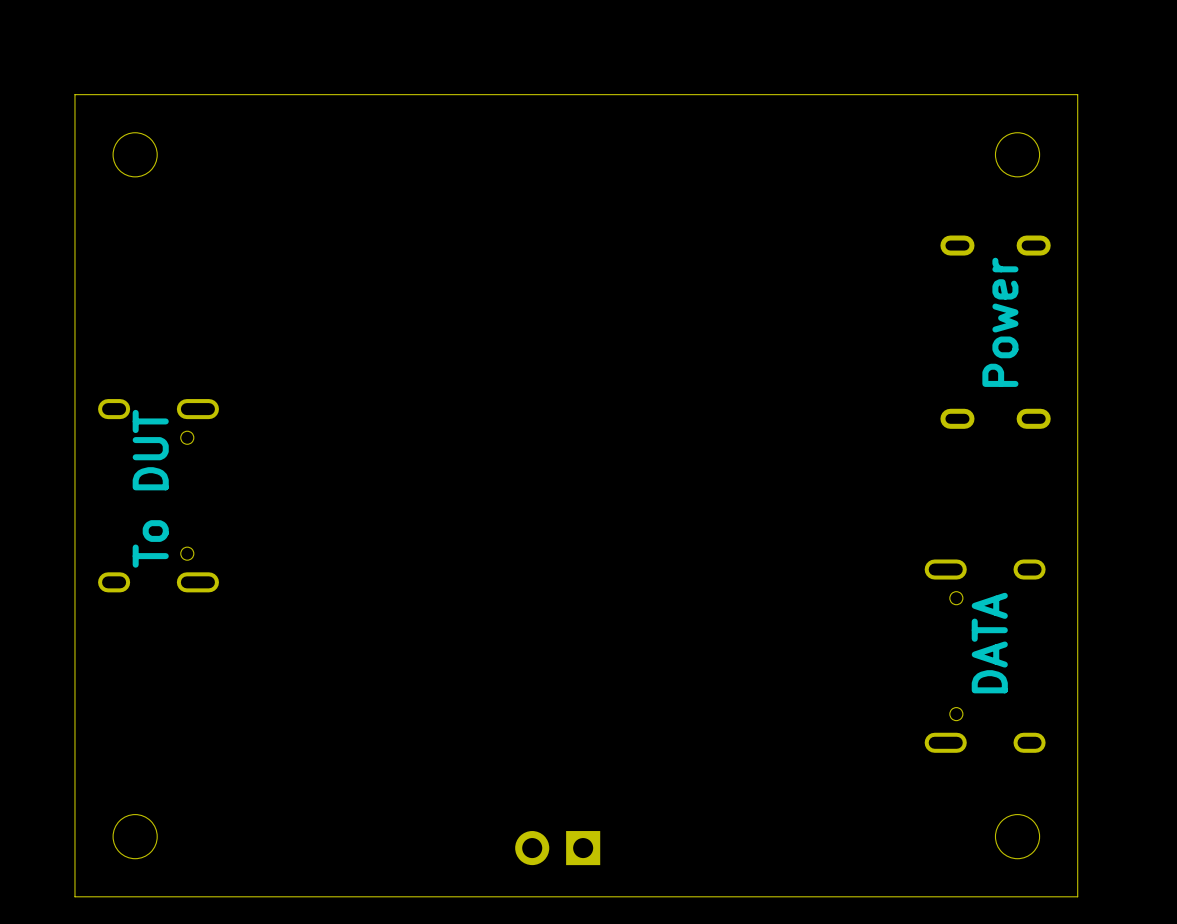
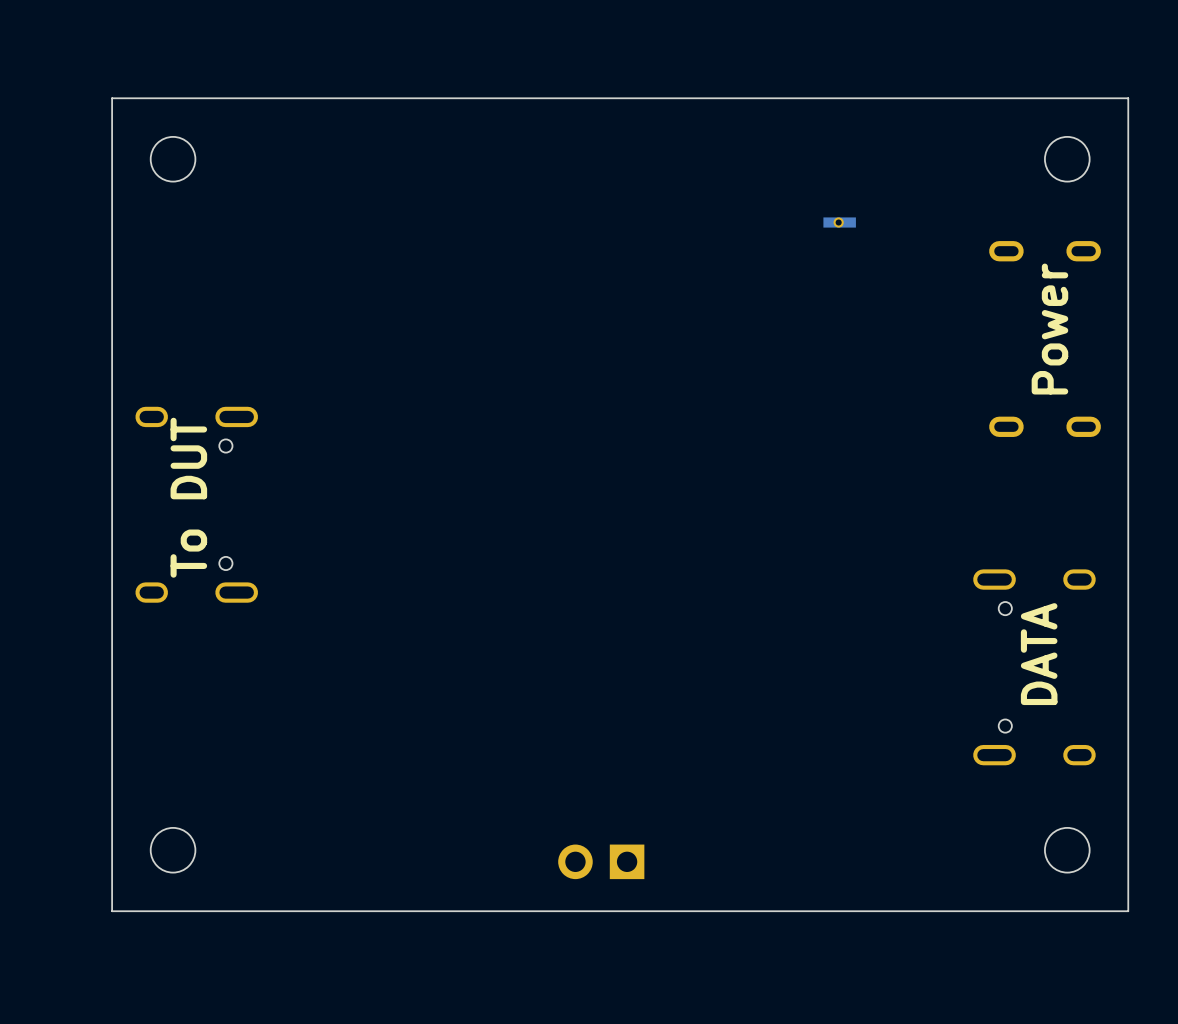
part: none -> (839, 222)

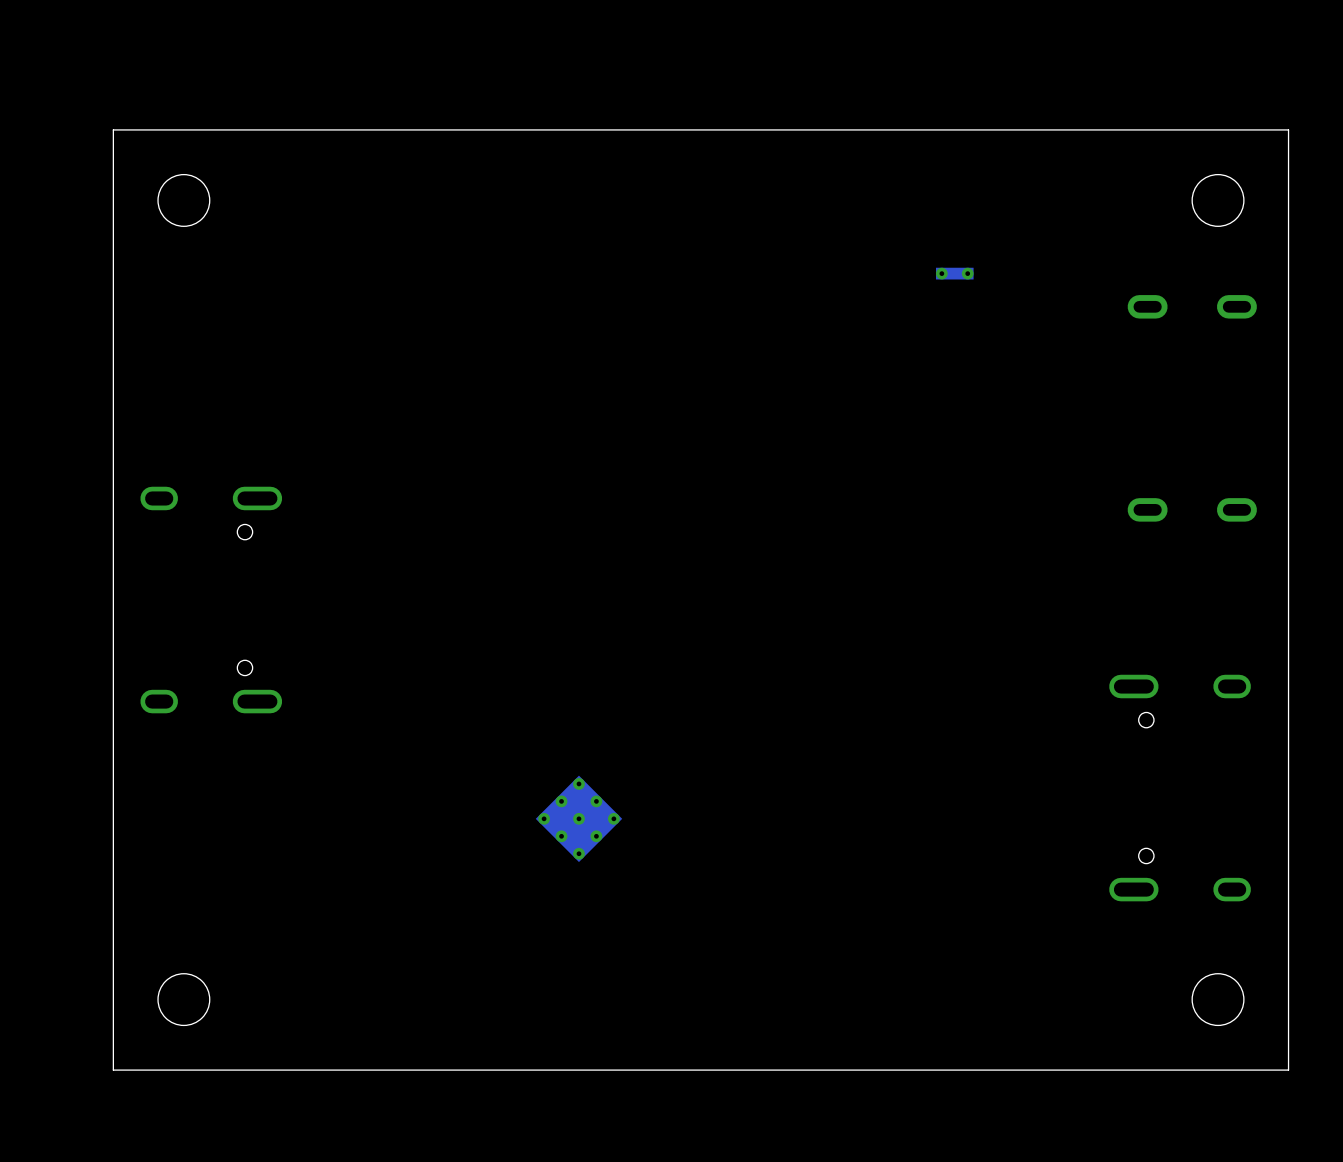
part footprint: [823, 217, 856, 228] -> [935, 267, 974, 280]
text: Power (1049, 329) -> none
text: To DUT (188, 497) -> none
text: DATA (1039, 654) -> none
part: none -> (578, 818)
part: (601, 861) -> none

